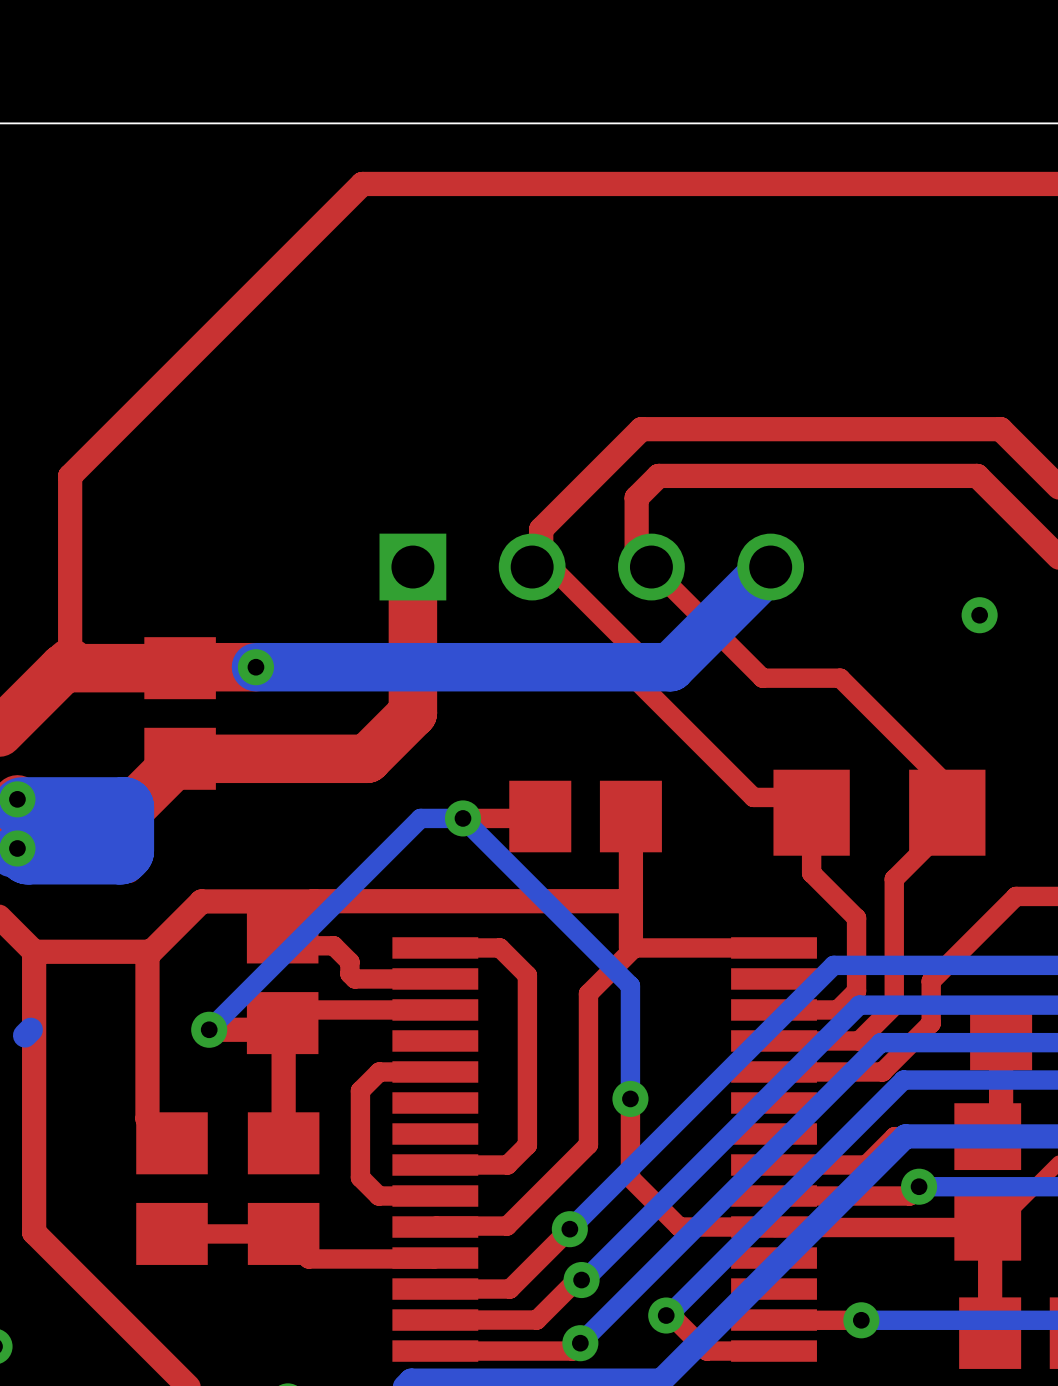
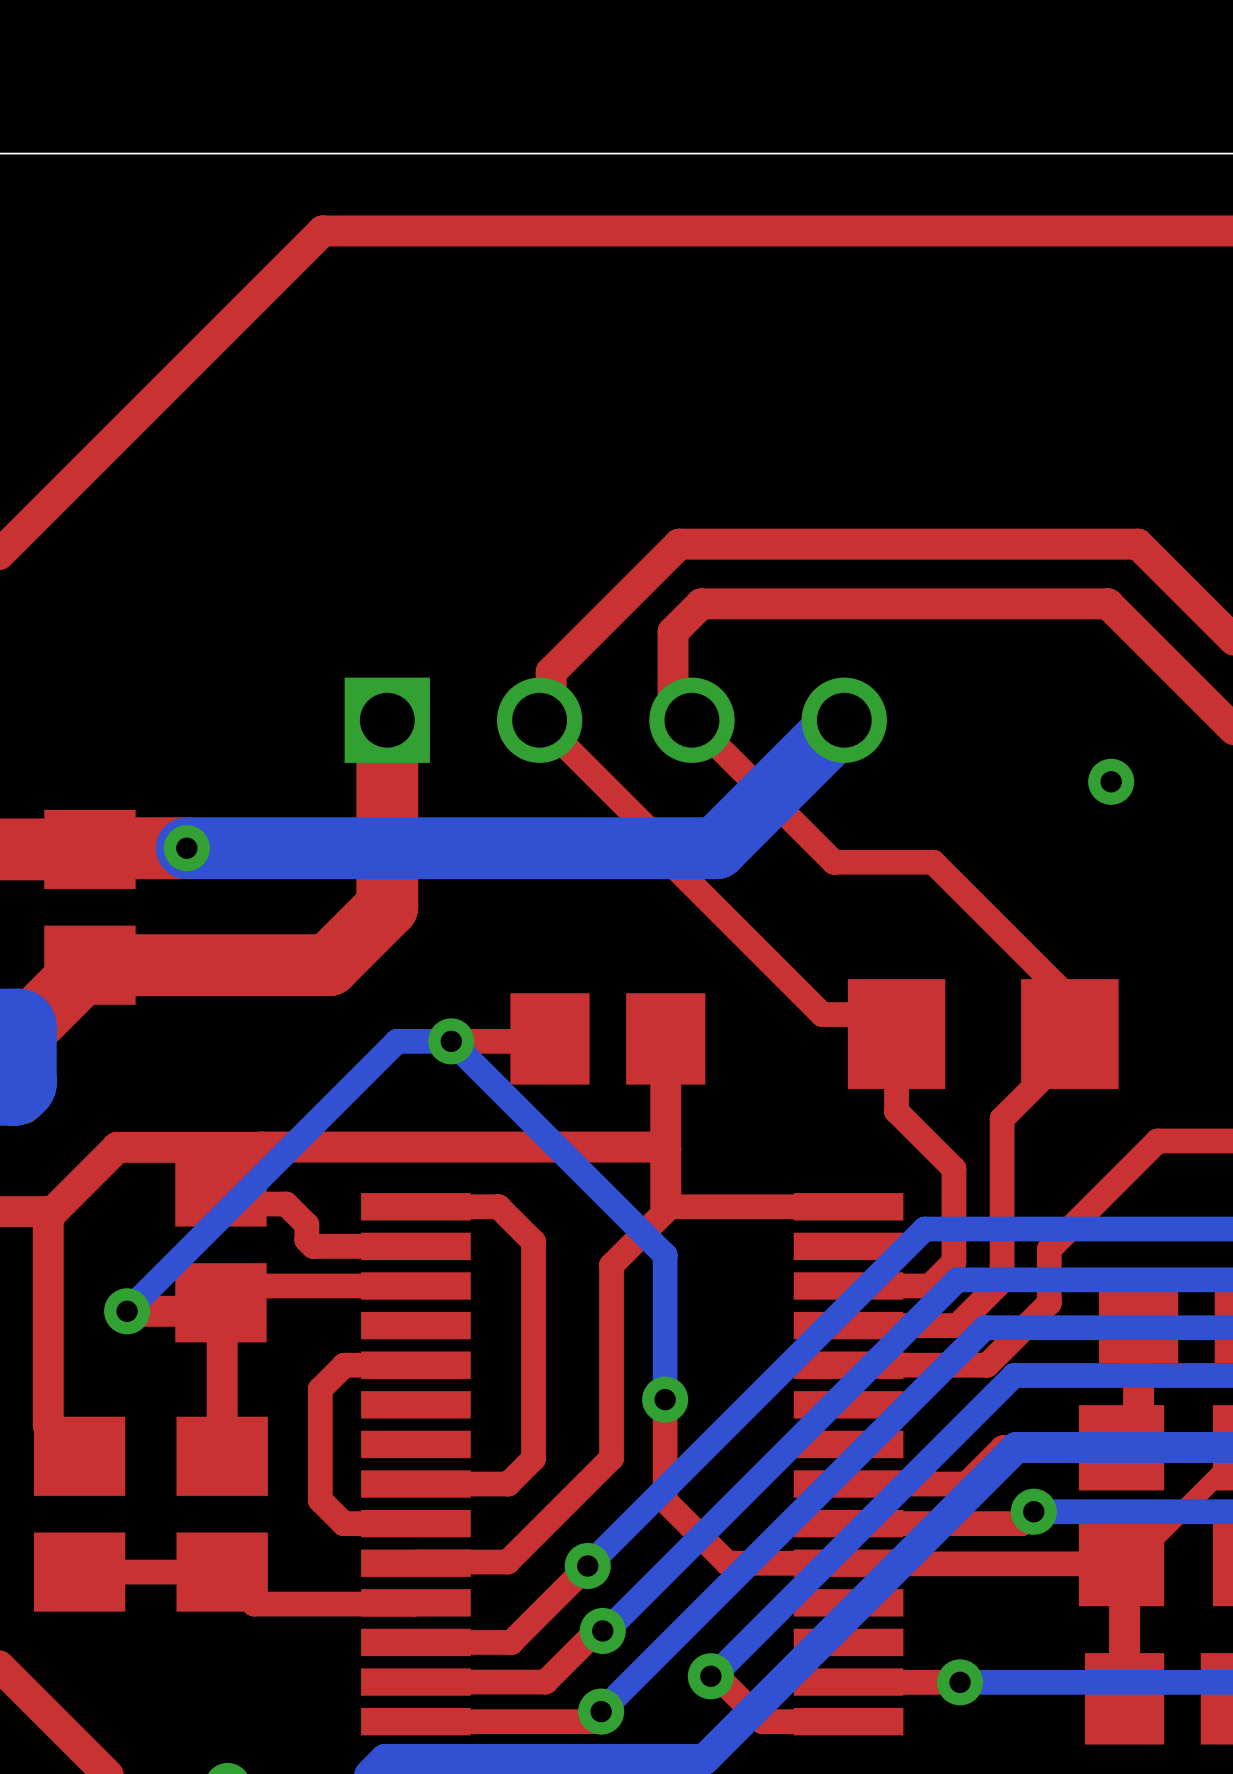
top track: (532, 567) (551, 567) (633, 649) (633, 668) -> (539, 720) (668, 849)

